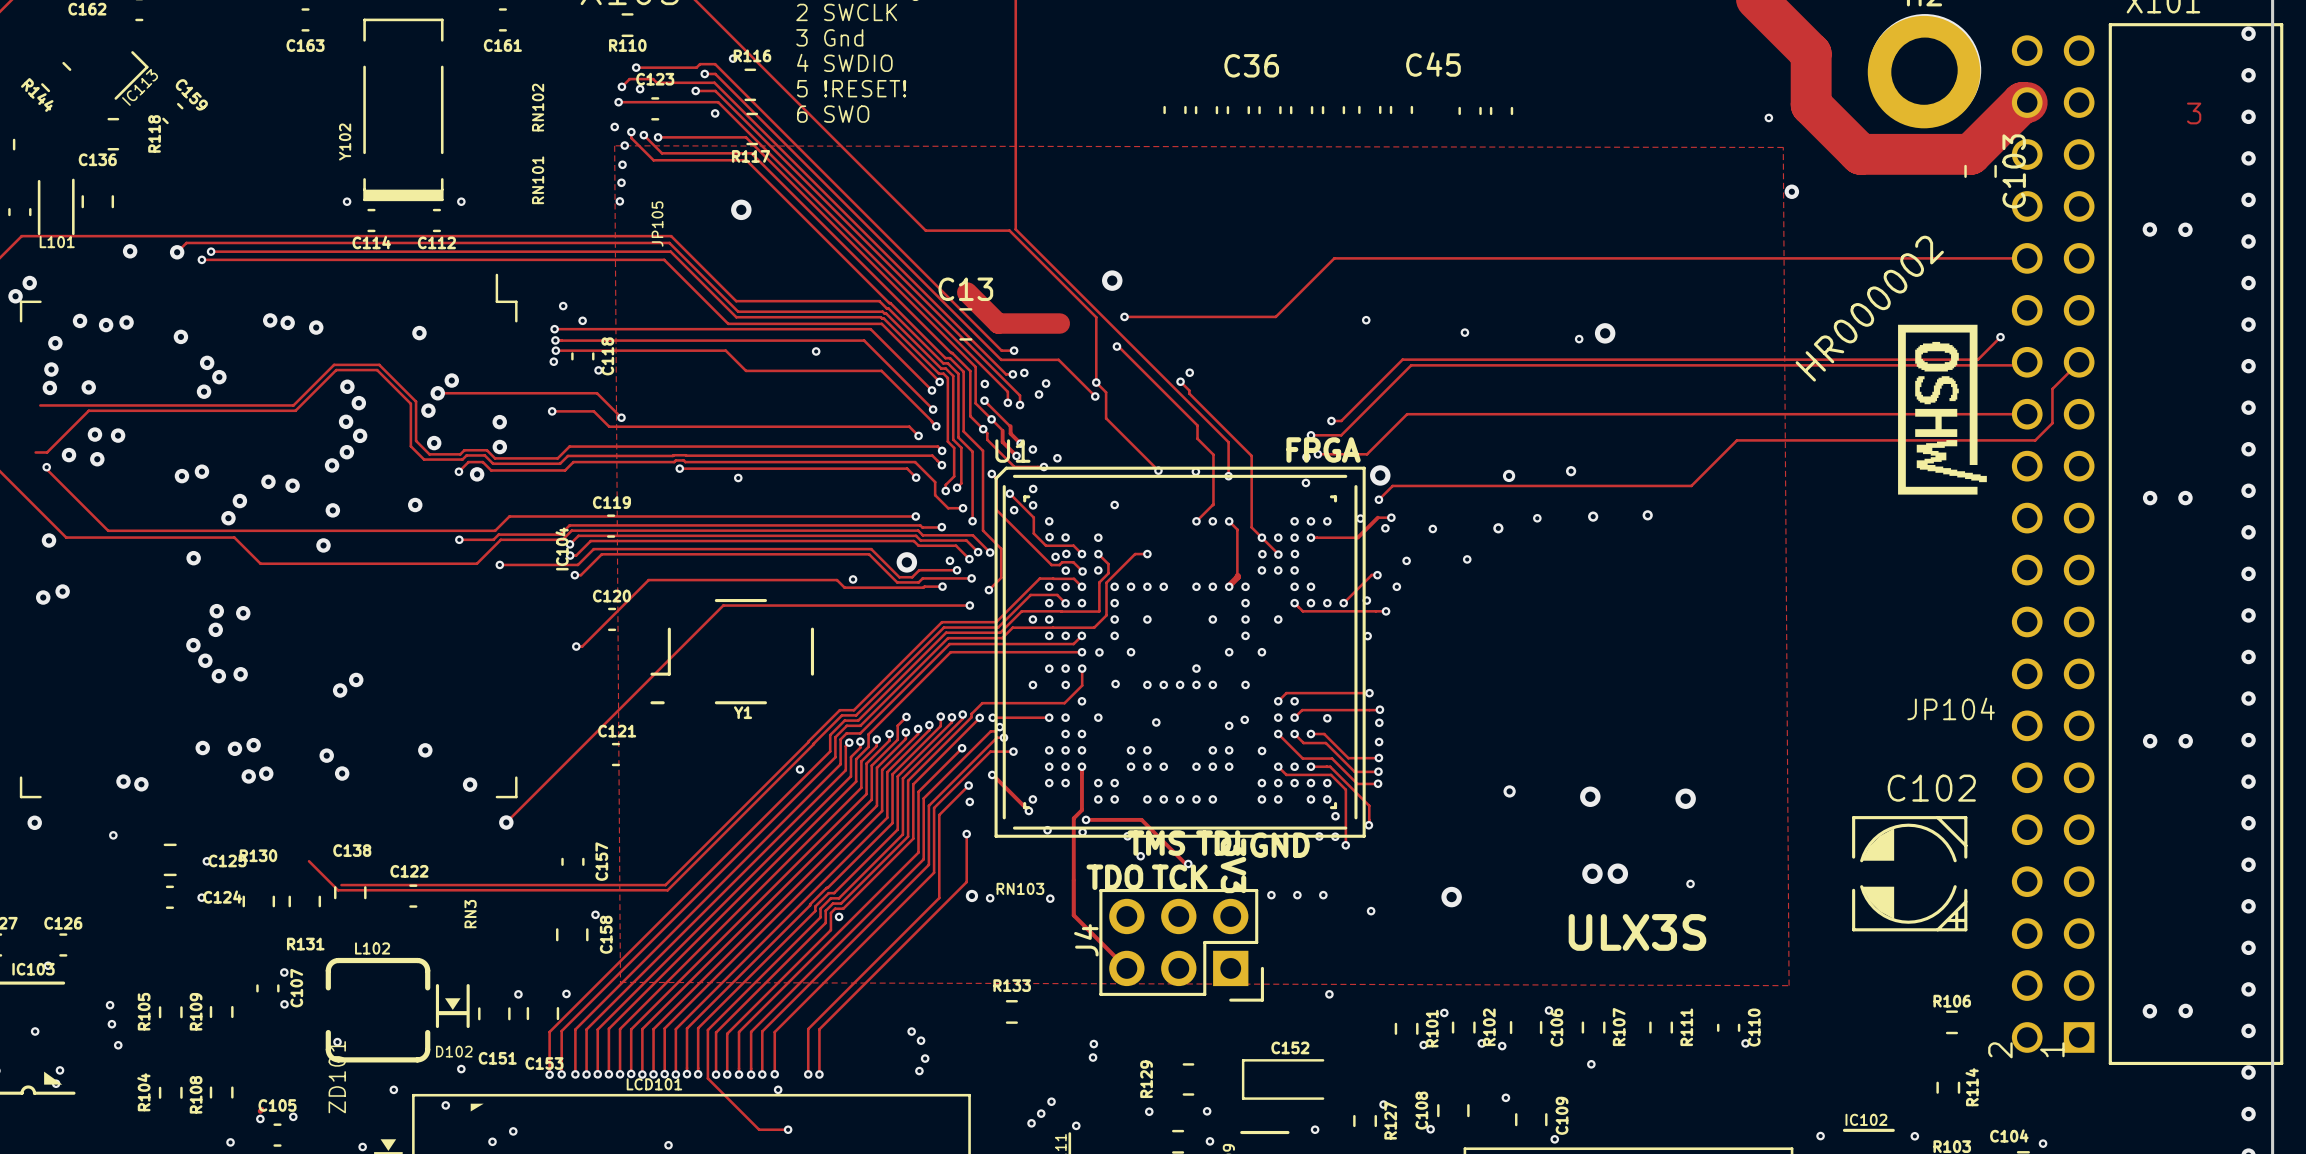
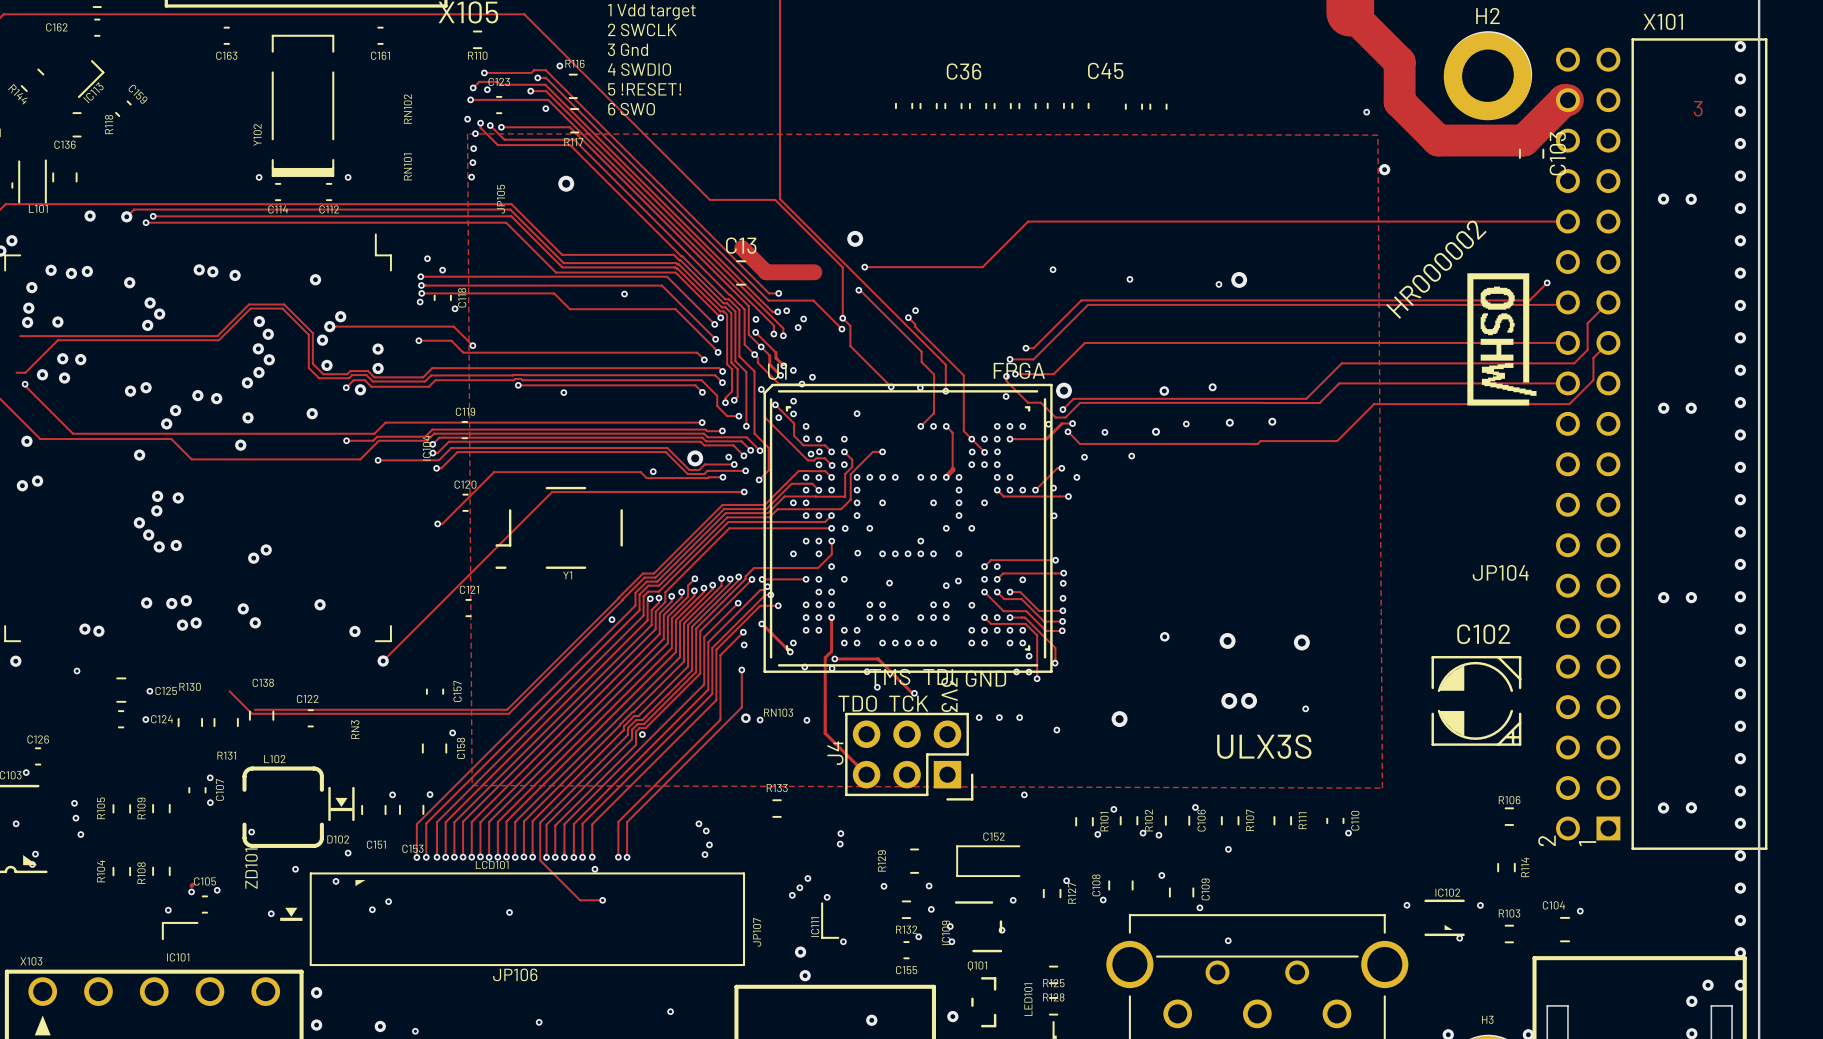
track: none -> (1608, 342) (1593, 357) (1593, 380) (1569, 404) (1374, 404) (1337, 441) (1260, 441) (1257, 443) (1080, 443) (1067, 431)
track: none -> (1006, 376) (1006, 381) (1028, 402) (1040, 402) (1055, 417) (1065, 417) (1080, 402) (1263, 402)
track: none -> (1567, 383) (1339, 383) (1319, 403) (1264, 403)

